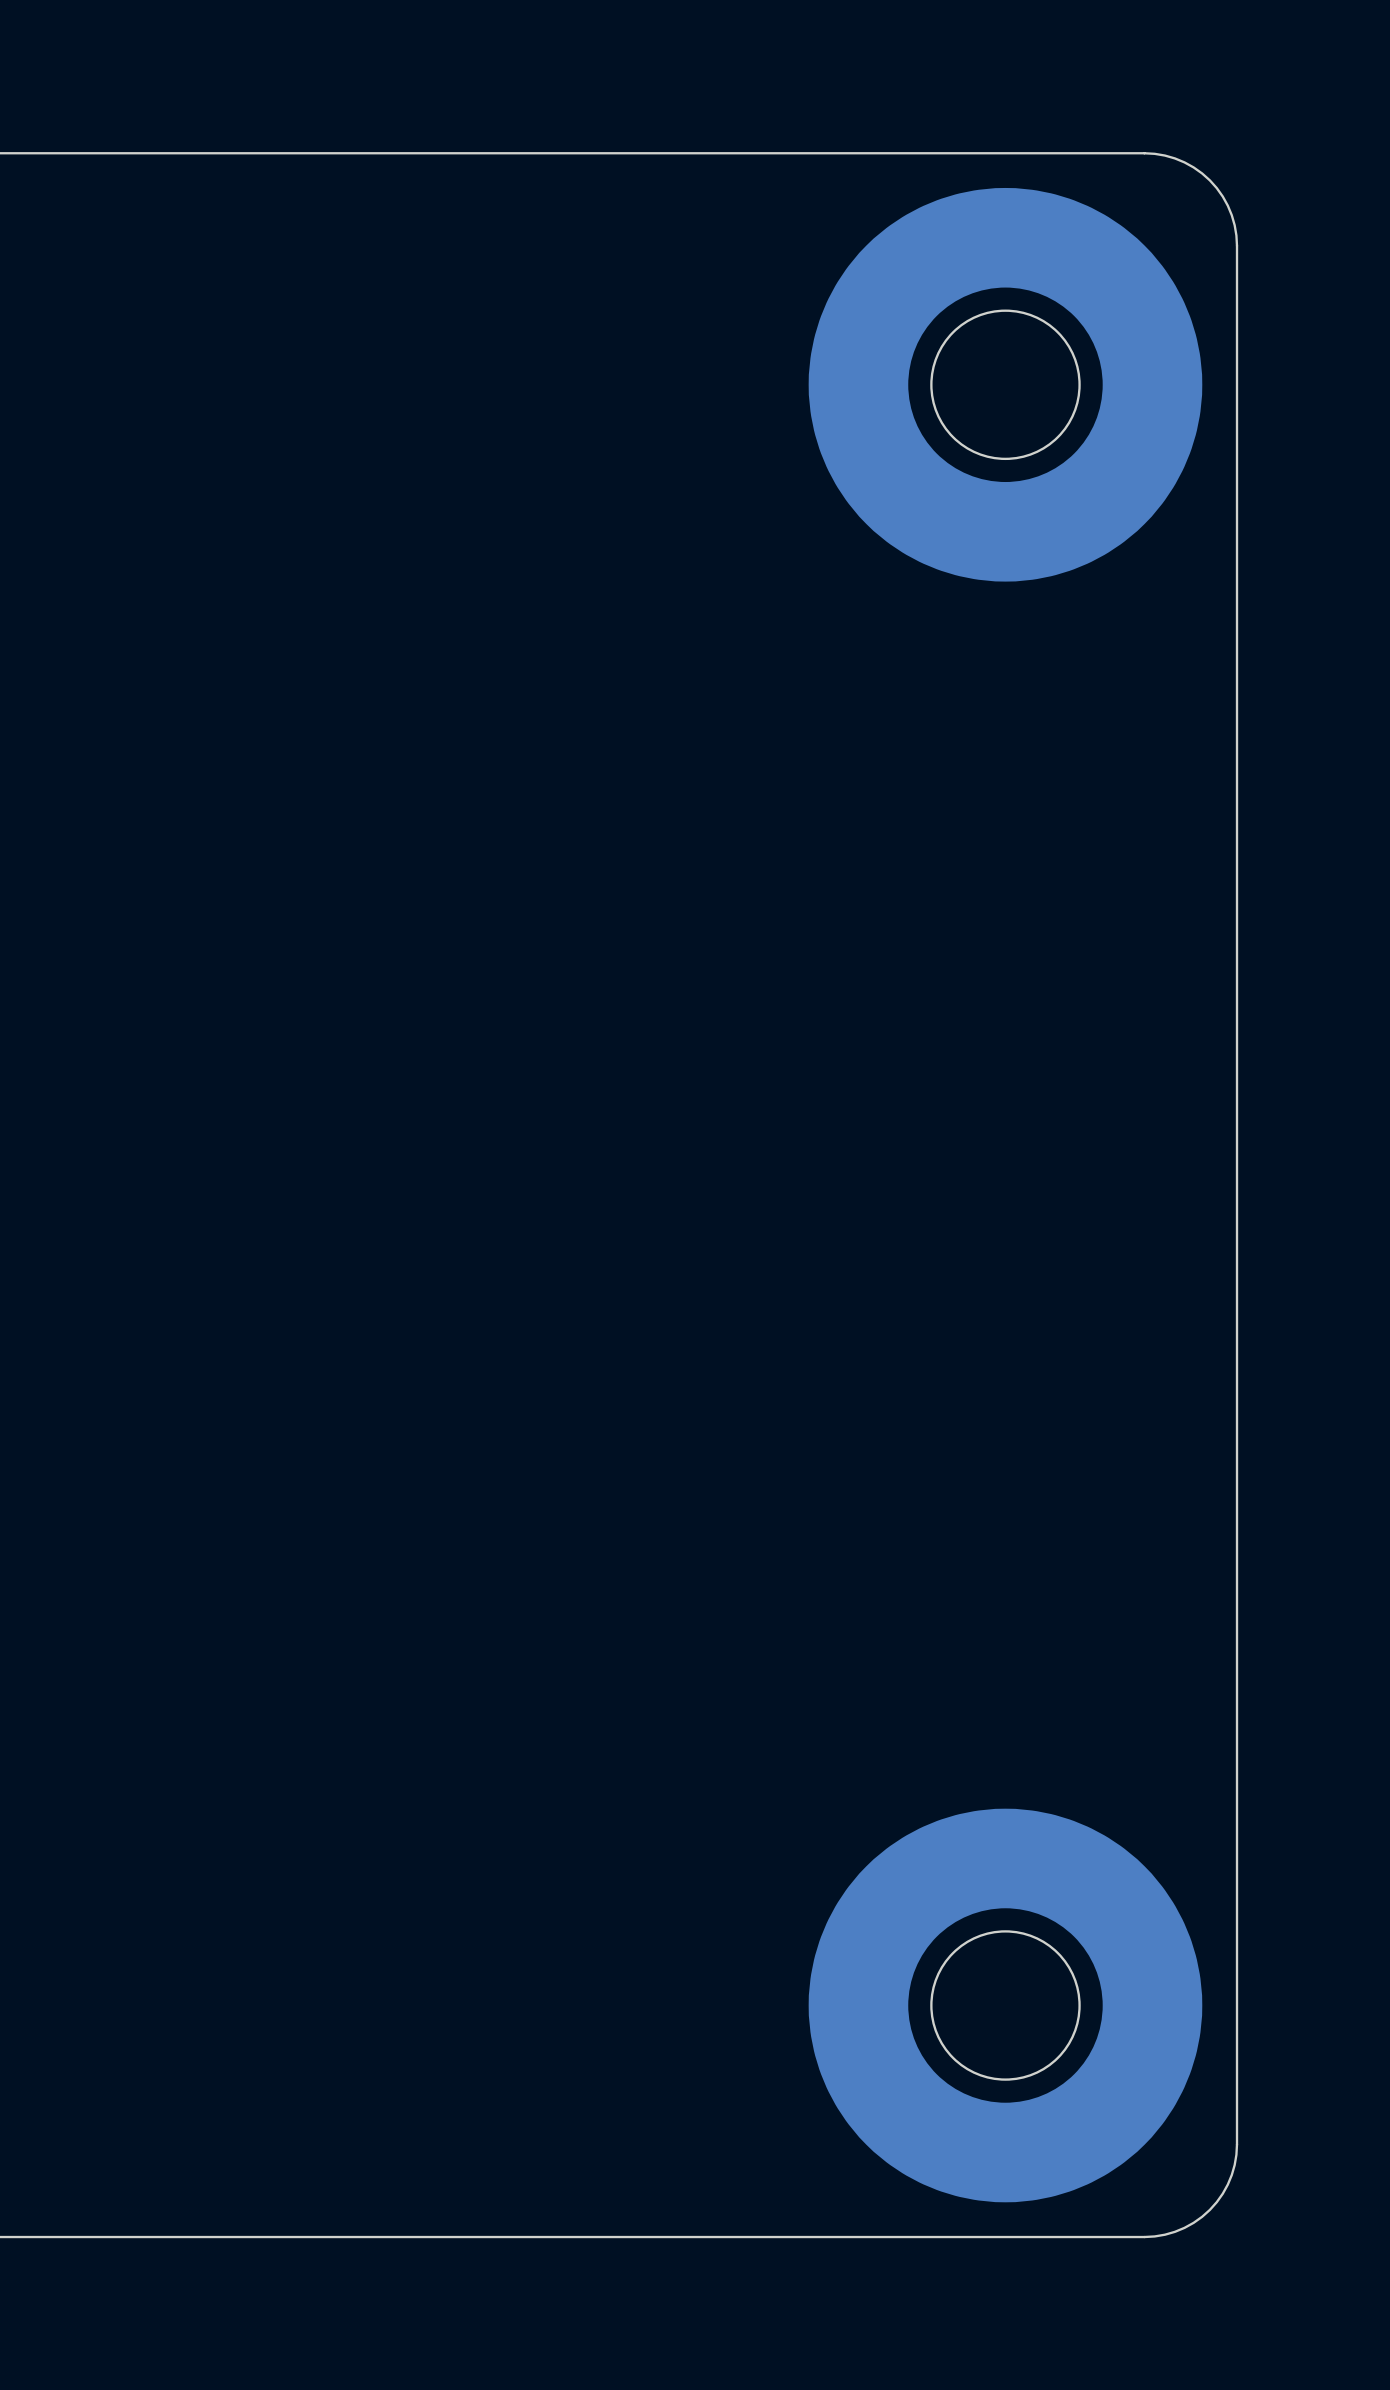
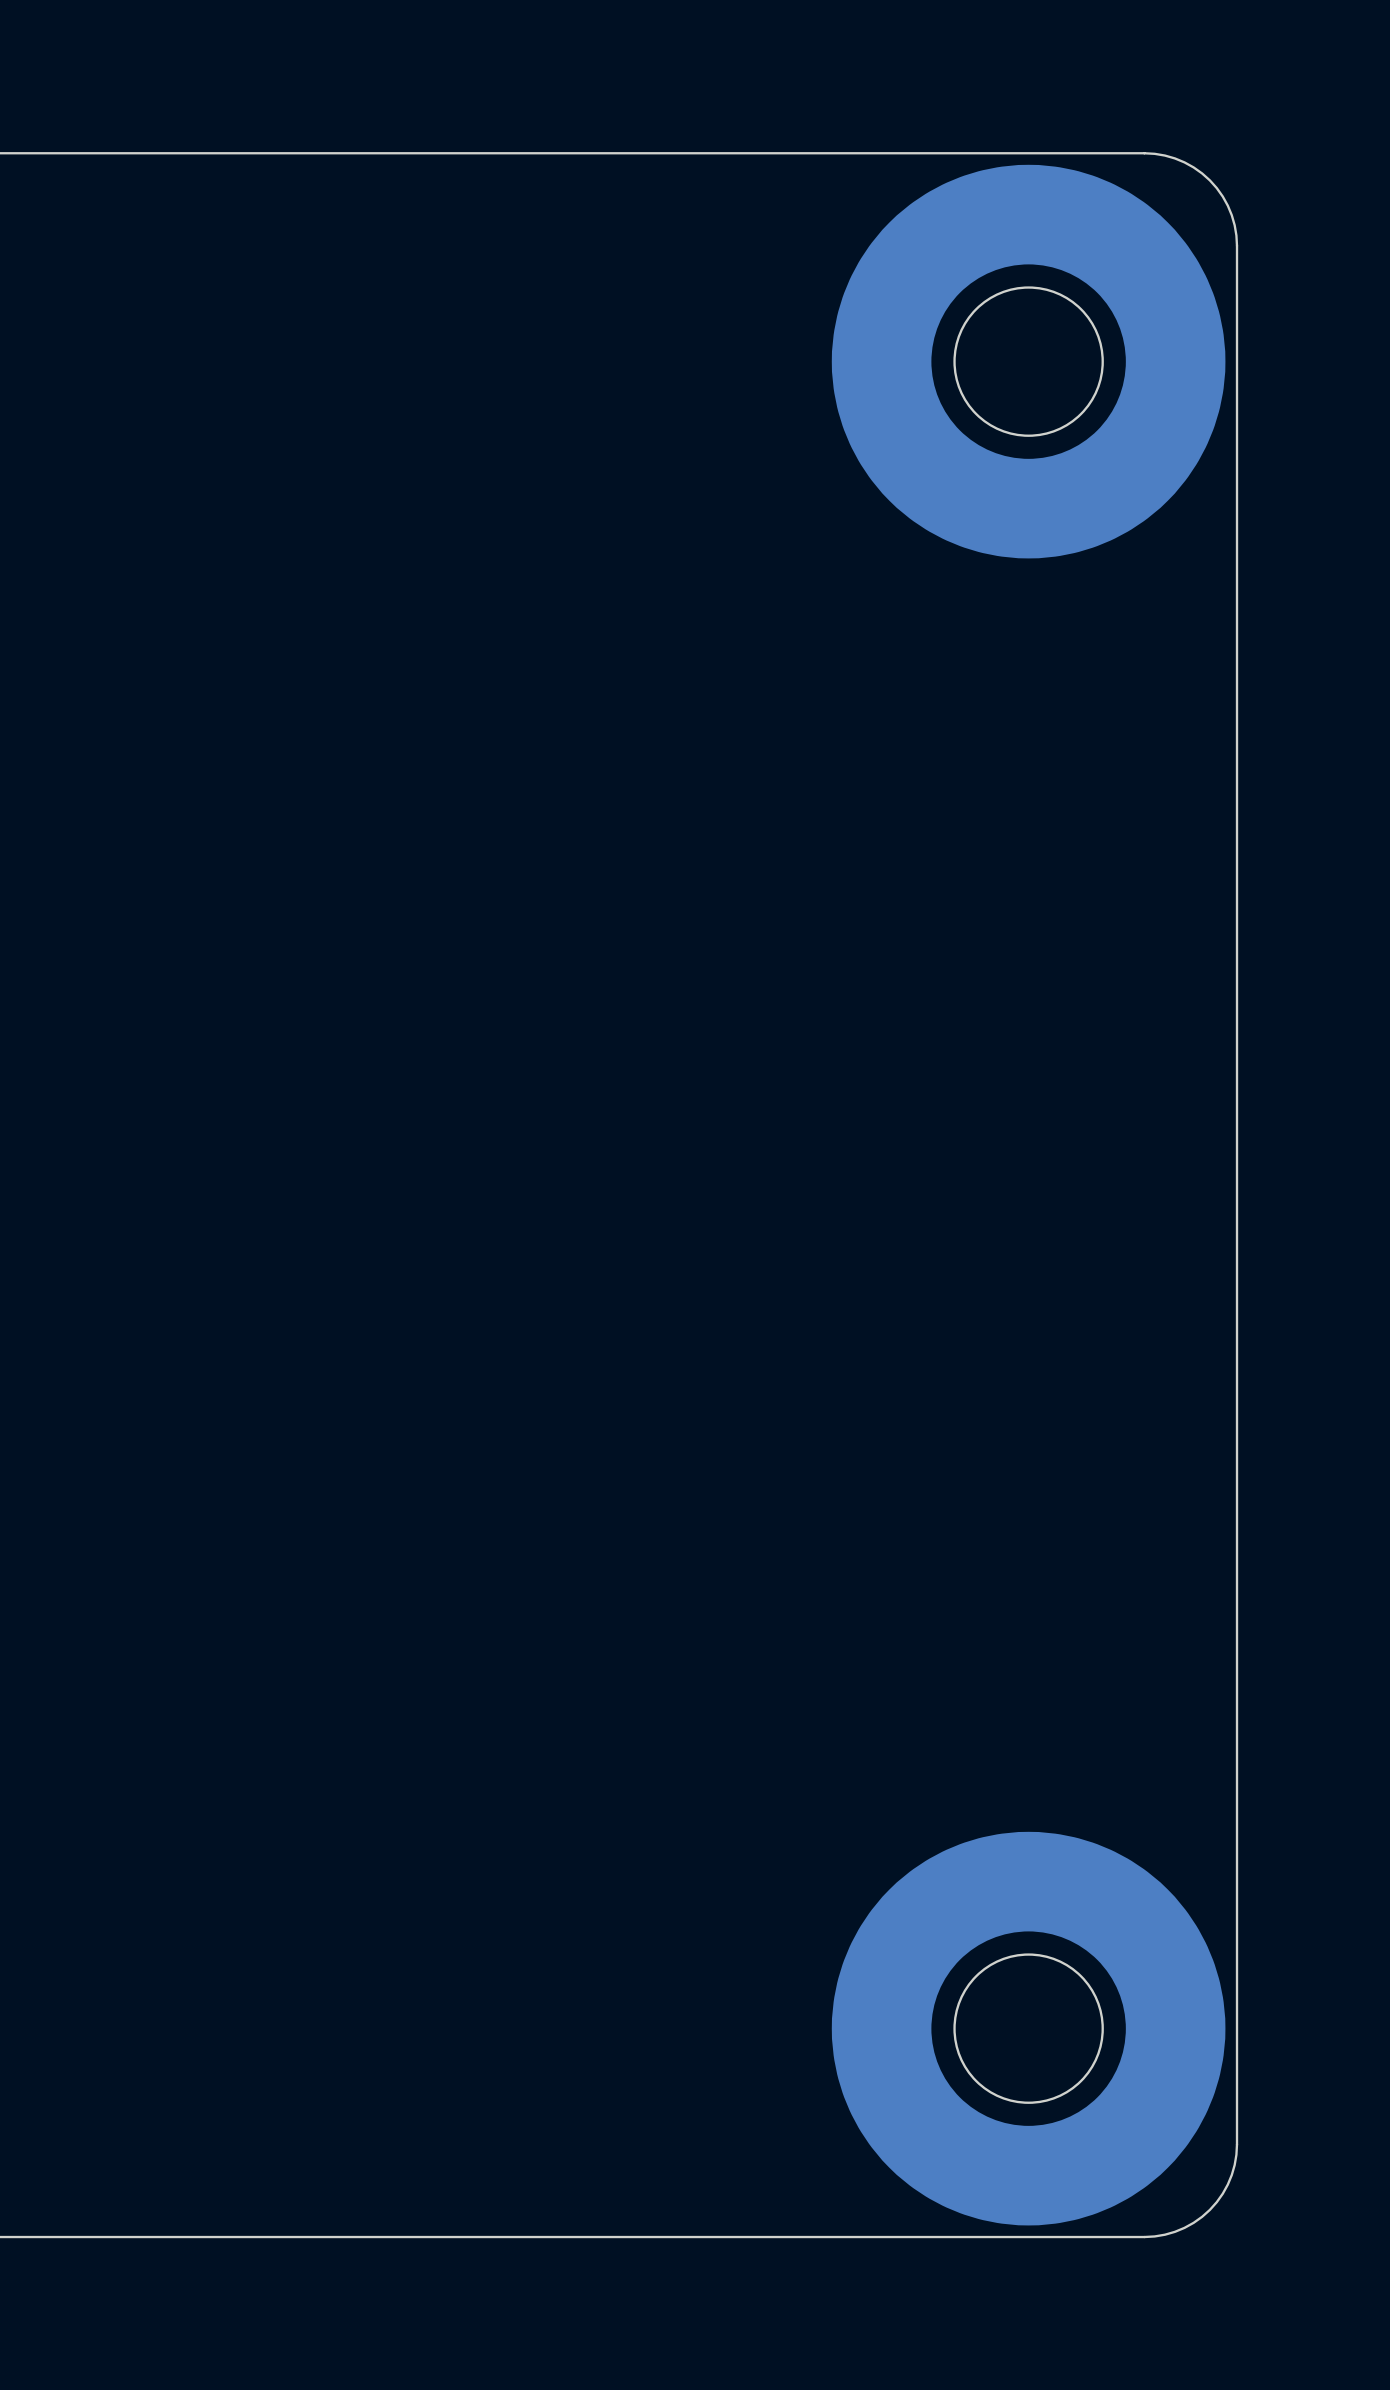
drawing position: (1005, 384) -> (1028, 361)
drawing position: (1005, 2005) -> (1028, 2028)

